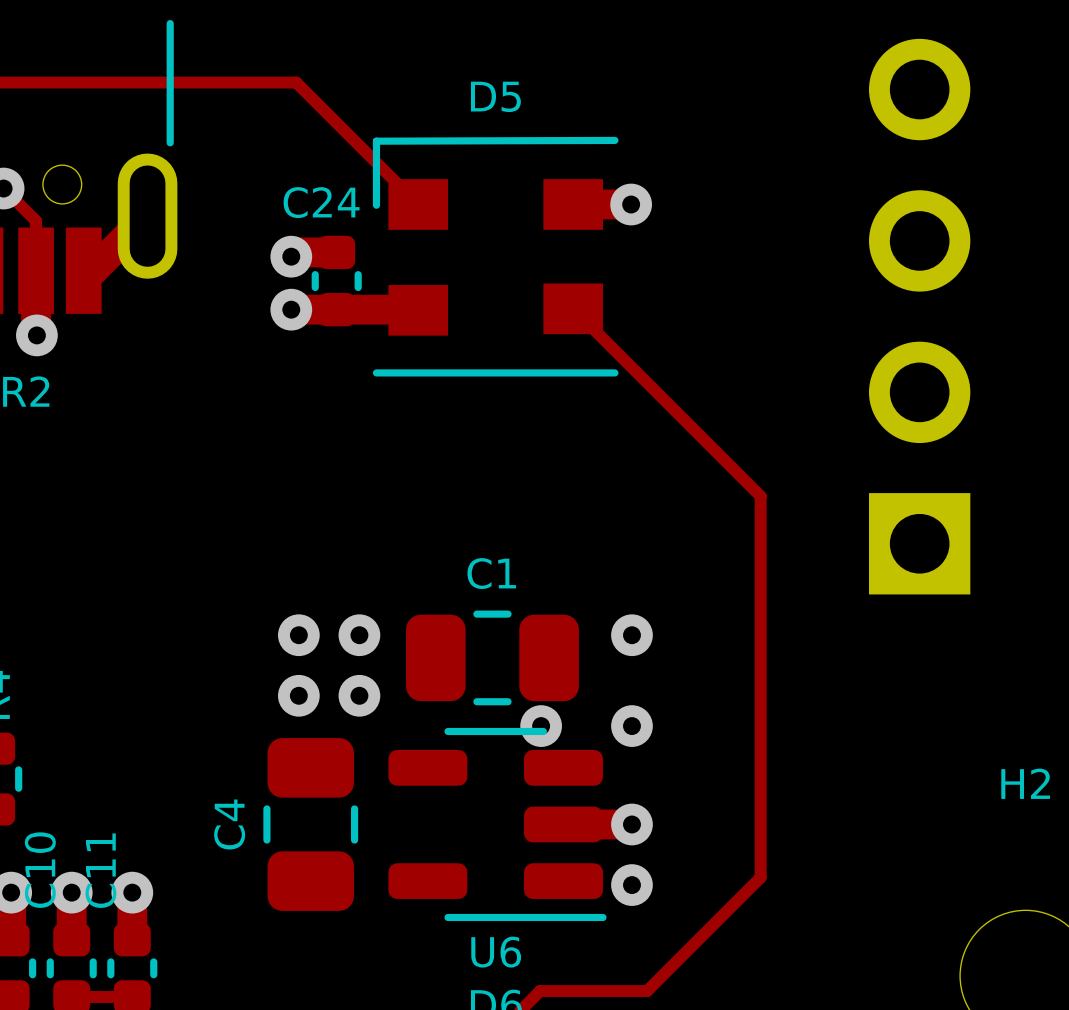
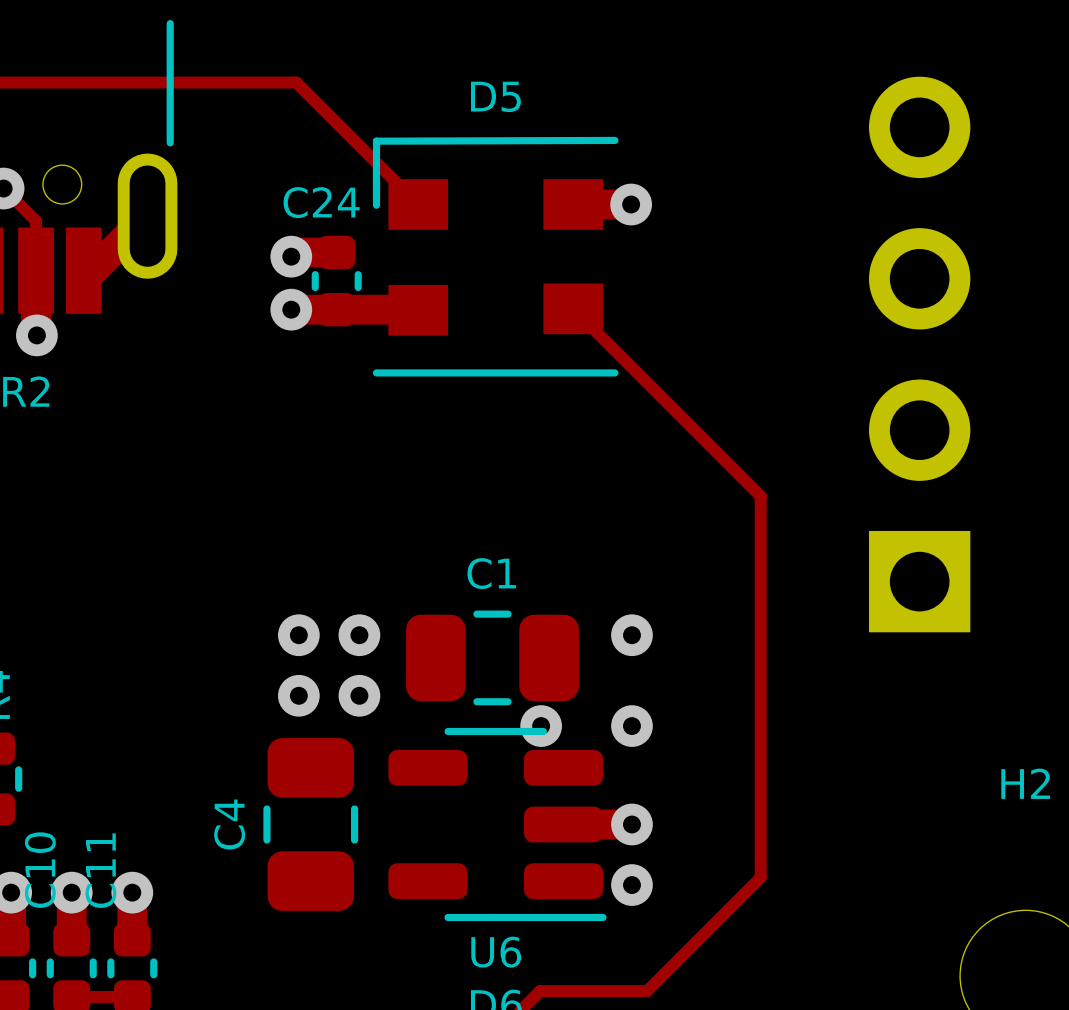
part position: (919, 316) -> (919, 354)

